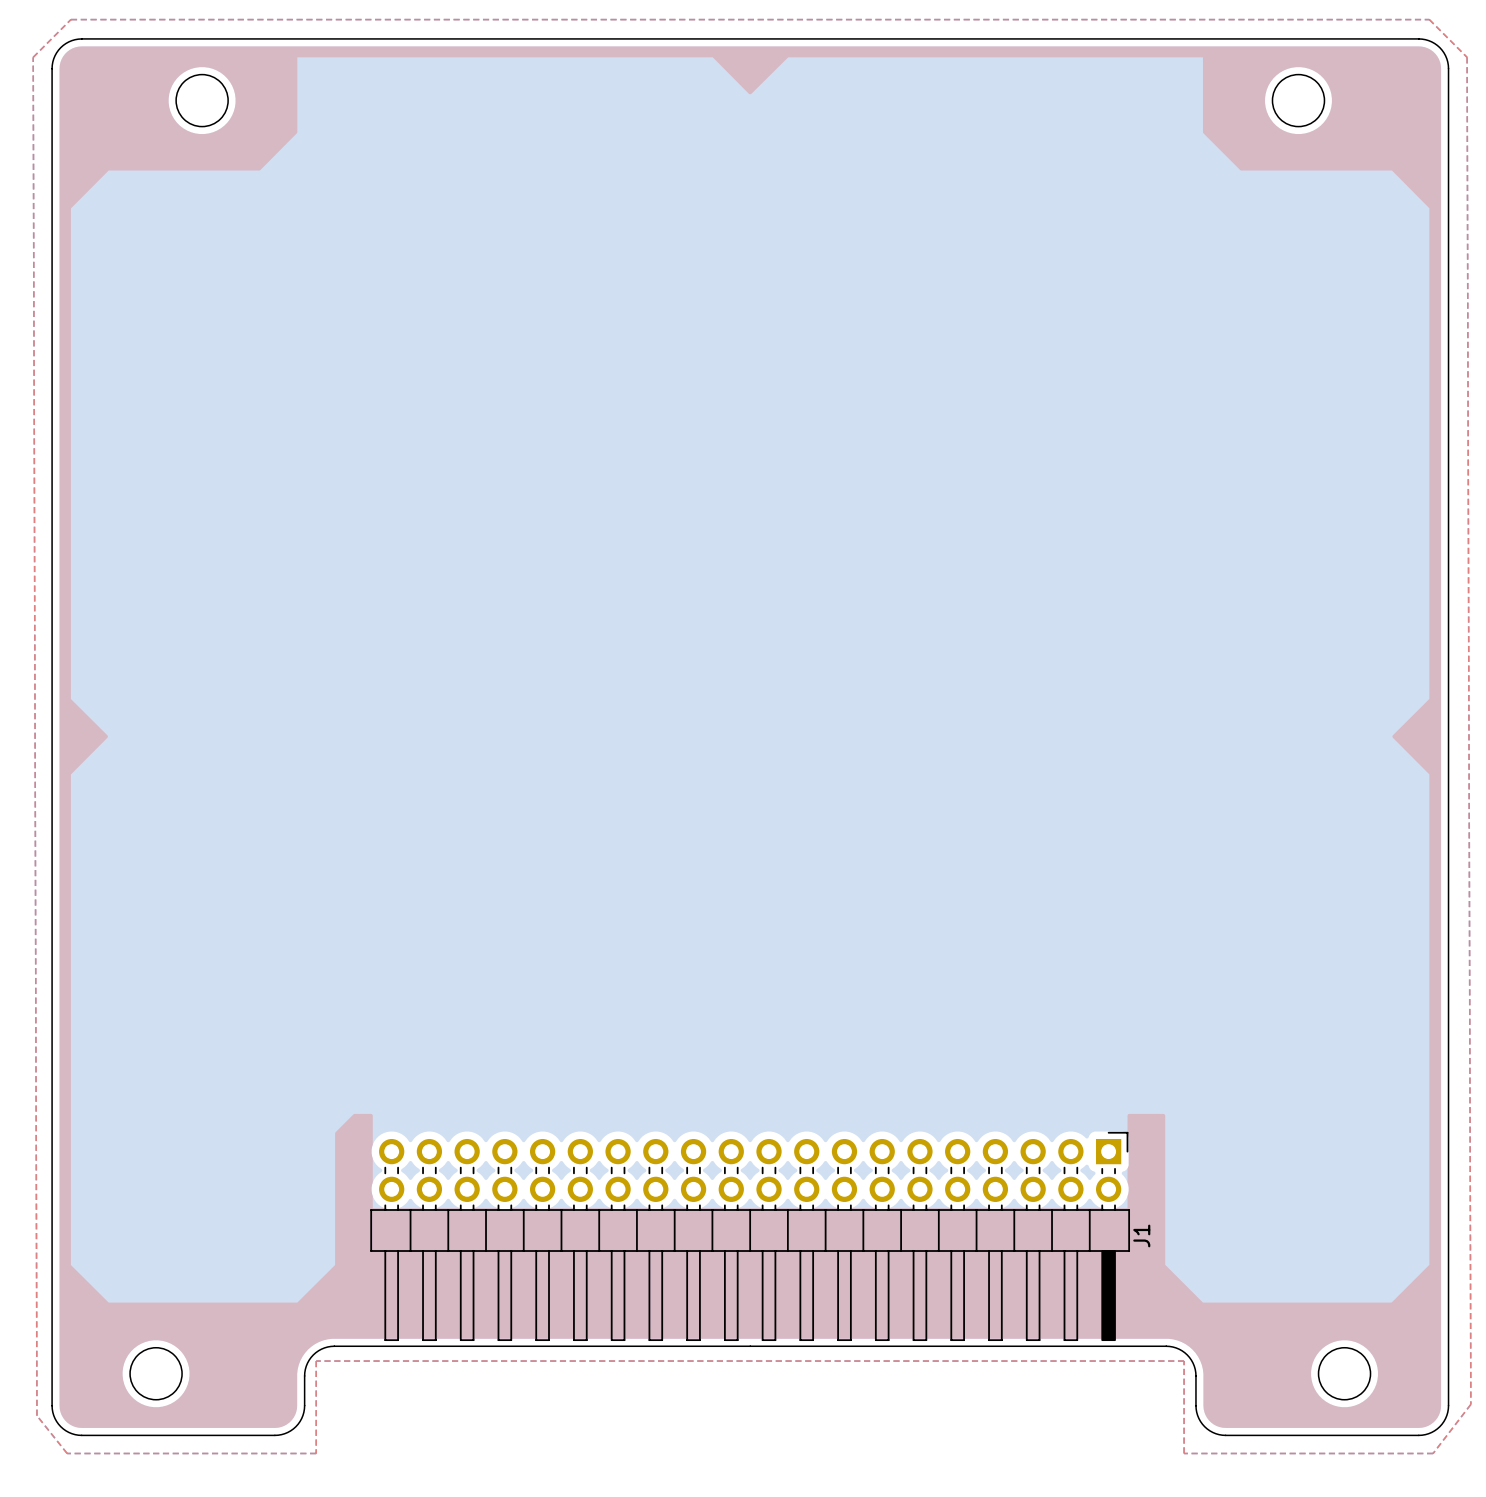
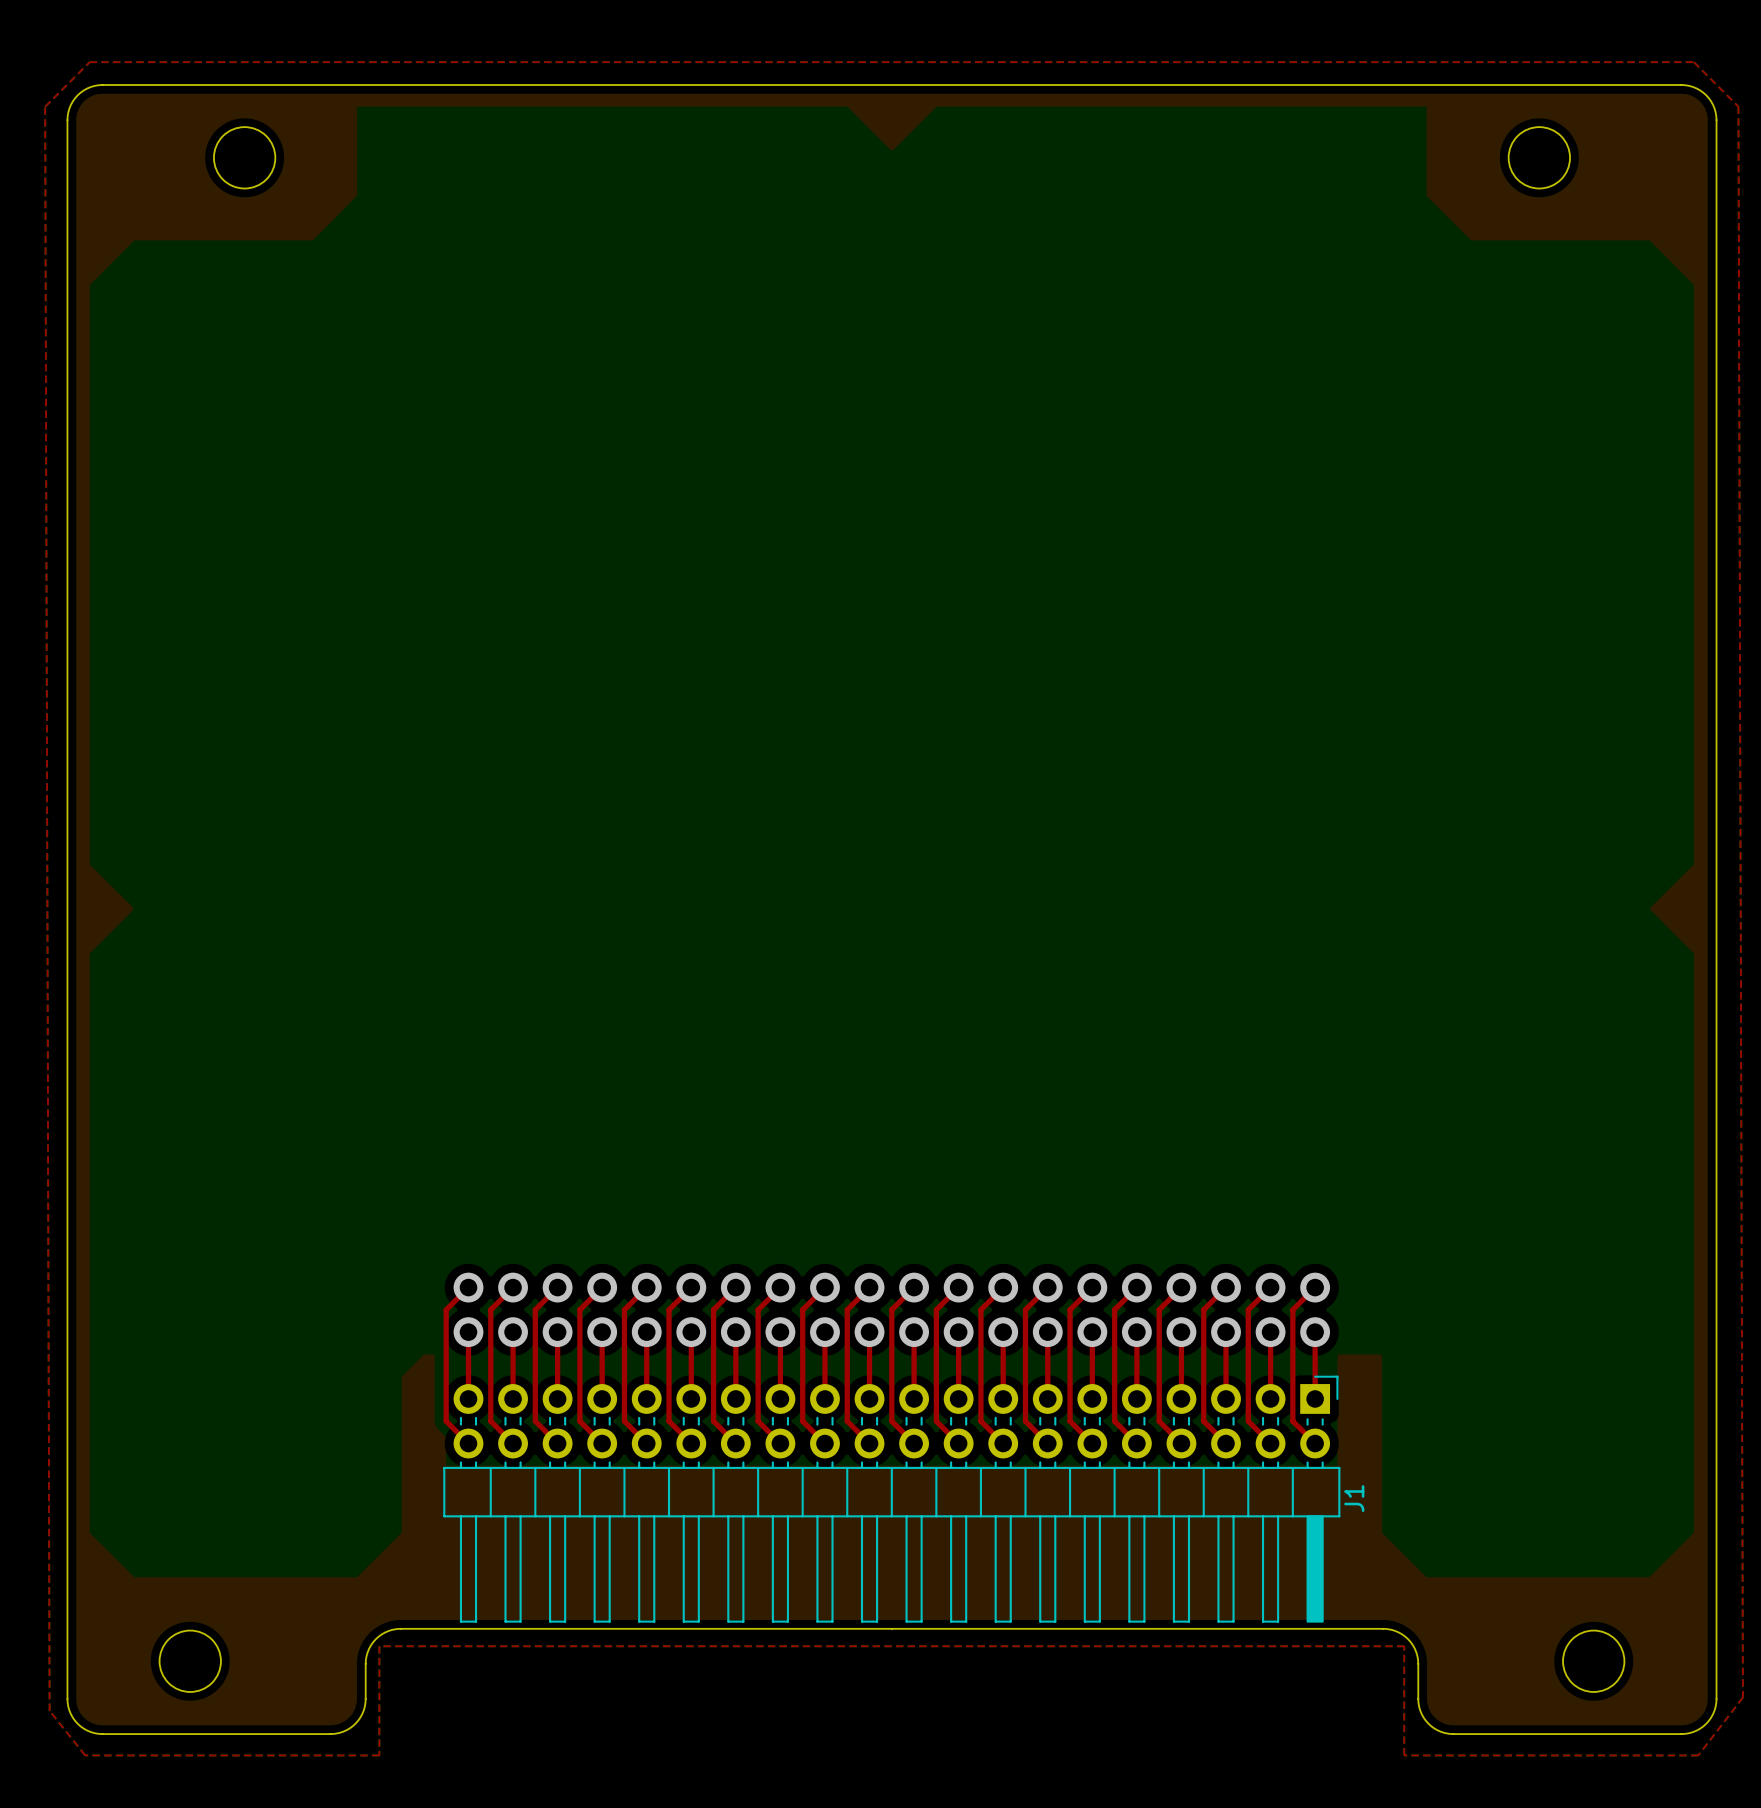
top track: none -> (468, 1287) (446, 1309) (446, 1421) (468, 1443)
via: none -> (468, 1287)
top track: none -> (513, 1287) (490, 1309) (490, 1421) (513, 1443)
via: none -> (513, 1287)
top track: none -> (557, 1287) (535, 1309) (535, 1421) (557, 1443)
via: none -> (557, 1287)
top track: none -> (602, 1287) (579, 1309) (579, 1421) (602, 1443)
via: none -> (602, 1287)
top track: none -> (646, 1287) (624, 1309) (624, 1421) (646, 1443)
via: none -> (646, 1287)
top track: none -> (691, 1287) (669, 1309) (669, 1421) (691, 1443)
via: none -> (691, 1287)
top track: none -> (735, 1287) (713, 1309) (713, 1421) (735, 1443)
via: none -> (735, 1287)
top track: none -> (780, 1287) (758, 1309) (758, 1421) (780, 1443)
via: none -> (780, 1287)
top track: none -> (824, 1287) (802, 1309) (802, 1421) (824, 1443)
via: none -> (824, 1287)
top track: none -> (869, 1287) (847, 1309) (847, 1421) (869, 1443)
via: none -> (869, 1287)
top track: none -> (914, 1287) (891, 1309) (891, 1421) (914, 1443)
via: none -> (914, 1287)
top track: none -> (958, 1287) (936, 1309) (936, 1421) (958, 1443)
via: none -> (958, 1287)
top track: none -> (1003, 1287) (980, 1309) (980, 1421) (1003, 1443)
via: none -> (1003, 1287)
top track: none -> (1047, 1287) (1025, 1309) (1025, 1421) (1047, 1443)
via: none -> (1047, 1287)
top track: none -> (1092, 1287) (1070, 1309) (1070, 1421) (1092, 1443)
via: none -> (1092, 1287)
top track: none -> (1136, 1287) (1114, 1309) (1114, 1421) (1136, 1443)
via: none -> (1136, 1287)
top track: none -> (1181, 1287) (1159, 1309) (1159, 1421) (1181, 1443)
via: none -> (1181, 1287)
top track: none -> (1226, 1287) (1203, 1309) (1203, 1421) (1226, 1443)
via: none -> (1226, 1287)
top track: none -> (1270, 1287) (1248, 1309) (1248, 1421) (1270, 1443)
via: none -> (1270, 1287)
top track: none -> (1315, 1287) (1292, 1309) (1292, 1421) (1315, 1443)
via: none -> (1315, 1287)
top track: none -> (468, 1332) (468, 1398)
via: none -> (468, 1332)
top track: none -> (513, 1332) (513, 1398)
via: none -> (513, 1332)
top track: none -> (557, 1332) (557, 1398)
via: none -> (557, 1332)
top track: none -> (602, 1332) (602, 1398)
via: none -> (602, 1332)
top track: none -> (646, 1332) (646, 1398)
via: none -> (646, 1332)
top track: none -> (691, 1332) (691, 1398)
via: none -> (691, 1332)
top track: none -> (735, 1332) (735, 1398)
via: none -> (735, 1332)
top track: none -> (780, 1332) (780, 1398)
via: none -> (780, 1332)
top track: none -> (824, 1332) (824, 1398)
via: none -> (824, 1332)
top track: none -> (869, 1332) (869, 1398)
via: none -> (869, 1332)
top track: none -> (914, 1332) (914, 1398)
via: none -> (914, 1332)
top track: none -> (958, 1332) (958, 1398)
via: none -> (958, 1332)
top track: none -> (1003, 1332) (1003, 1398)
via: none -> (1003, 1332)
top track: none -> (1047, 1332) (1047, 1398)
via: none -> (1047, 1332)
top track: none -> (1092, 1332) (1092, 1398)
via: none -> (1092, 1332)
top track: none -> (1136, 1332) (1136, 1398)
via: none -> (1136, 1332)
top track: none -> (1181, 1332) (1181, 1398)
via: none -> (1181, 1332)
top track: none -> (1226, 1332) (1226, 1398)
via: none -> (1226, 1332)
top track: none -> (1270, 1332) (1270, 1398)
via: none -> (1270, 1332)
top track: none -> (1315, 1332) (1315, 1398)
via: none -> (1315, 1332)

